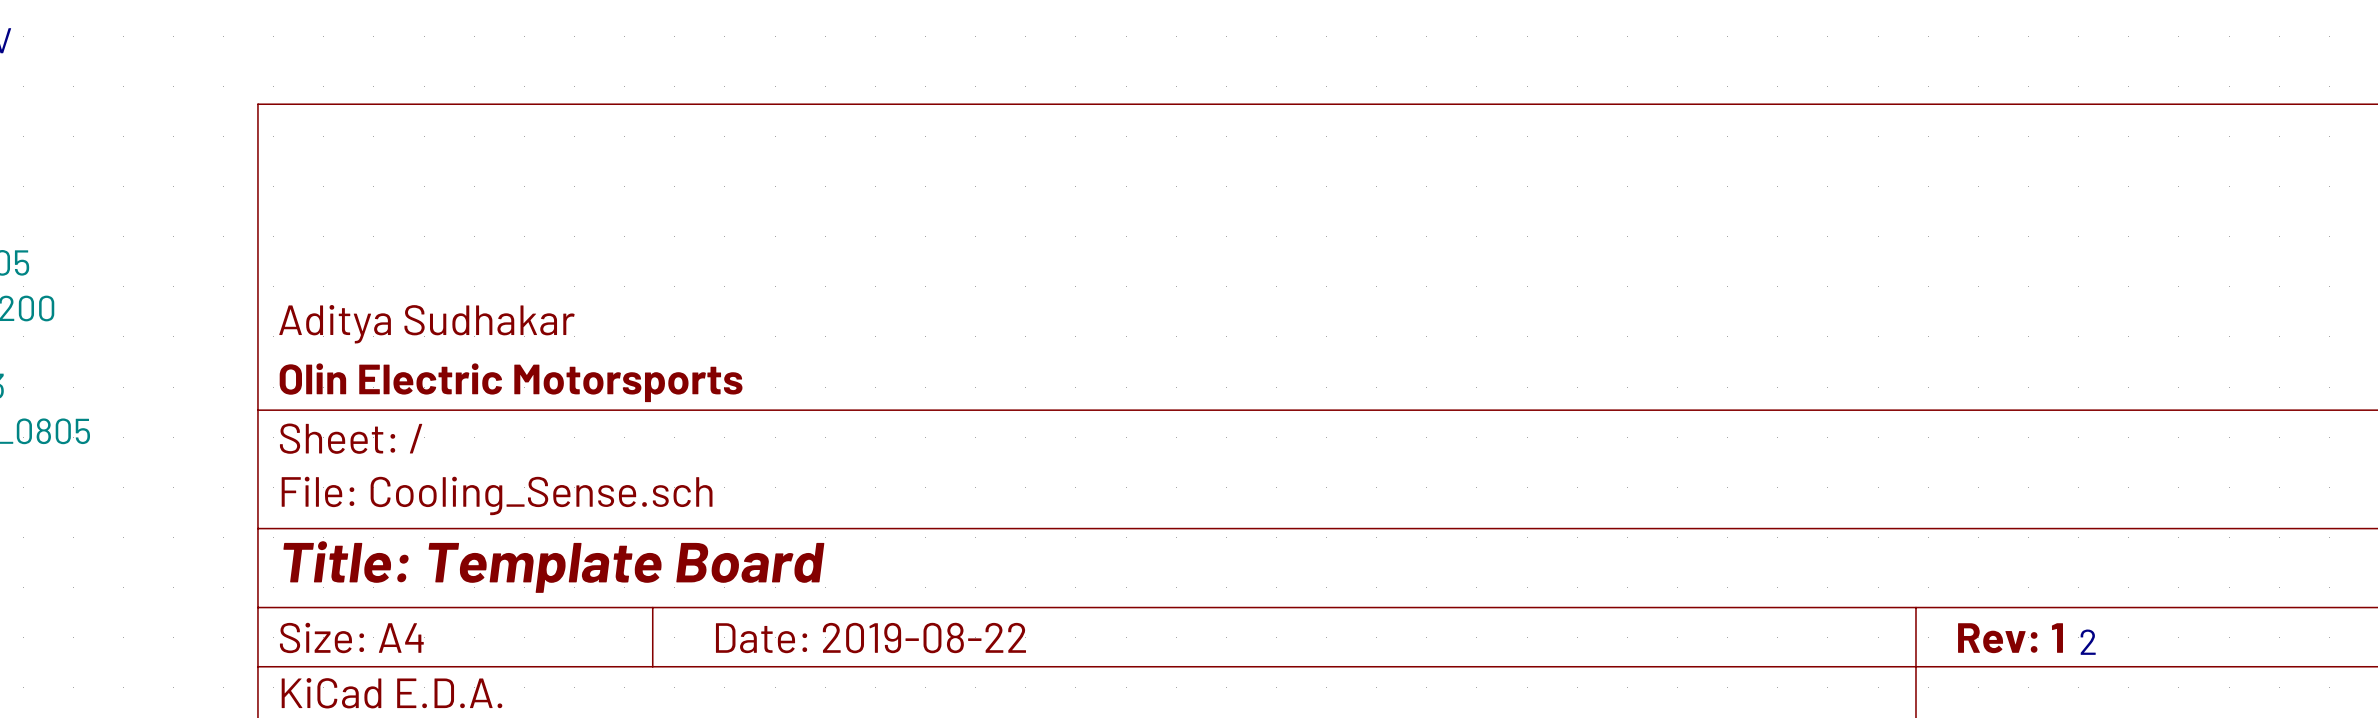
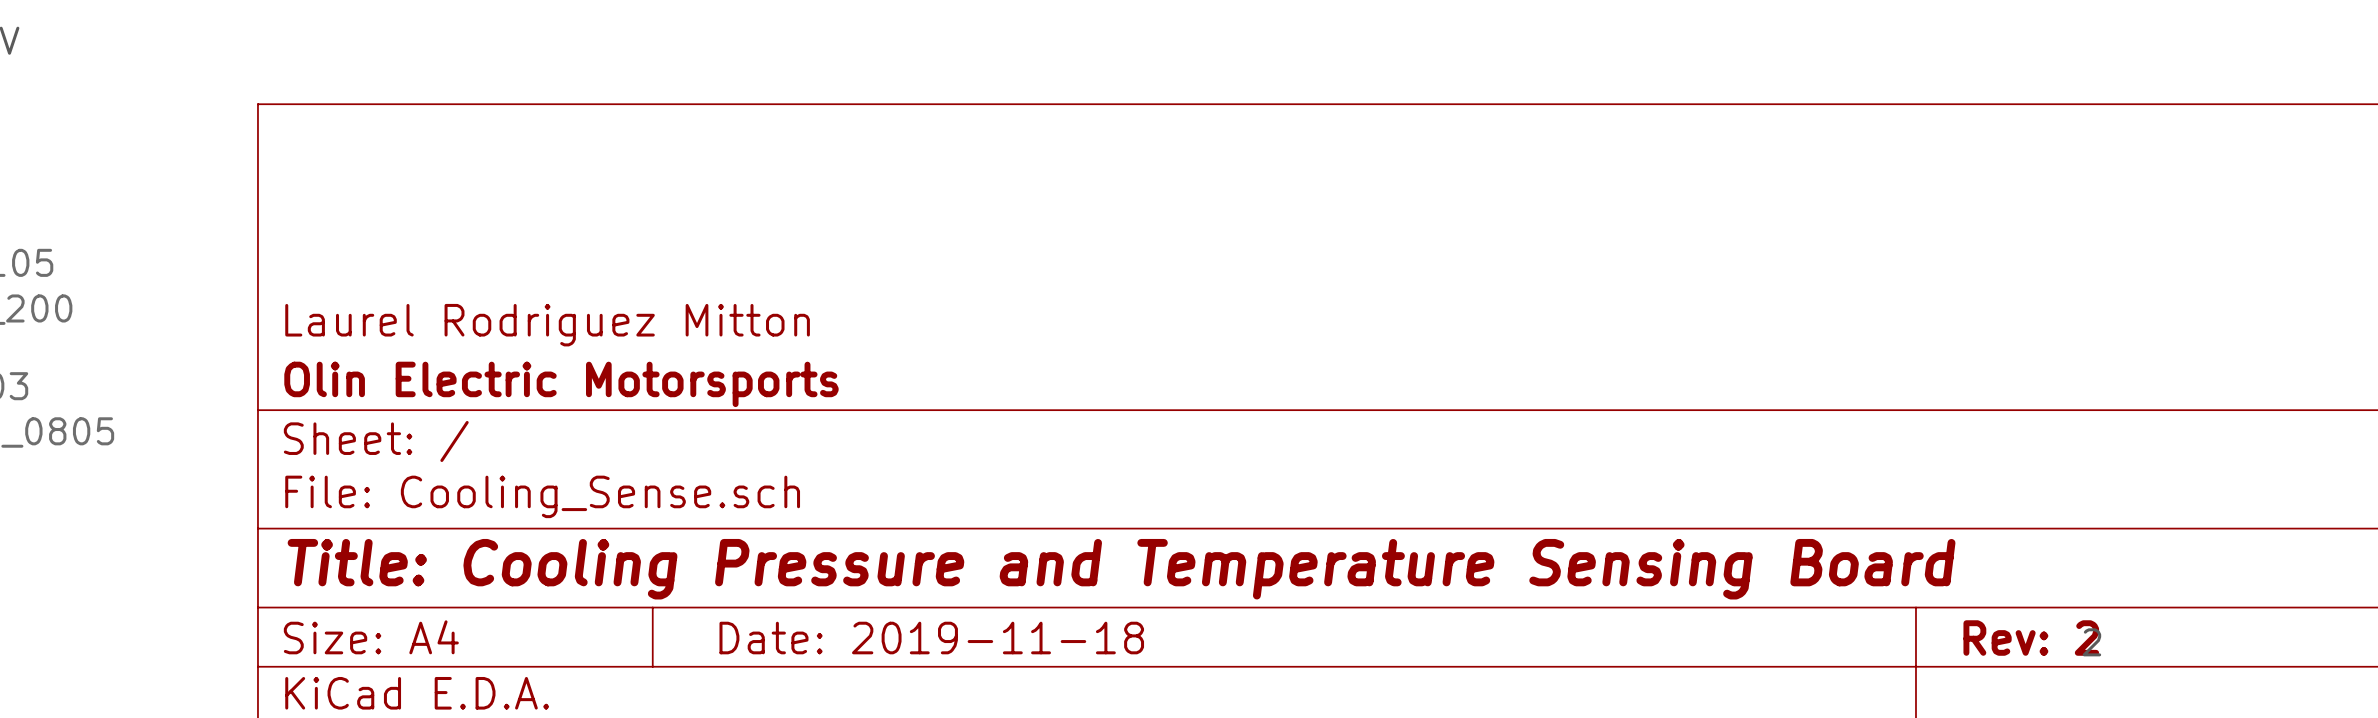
title block: Aditya Sudhakar (426, 324) -> Laurel Rodriguez Mitton (547, 325)
title block: Title: Template Board (553, 567) -> Title: Cooling Pressure and Temperature Sensing Board (1121, 569)
title block: Date: 2019-08-22 (870, 638) -> Date: 2019-11-18 (931, 638)
title block: Rev: 1 (2010, 638) -> Rev: 2 (2031, 638)

